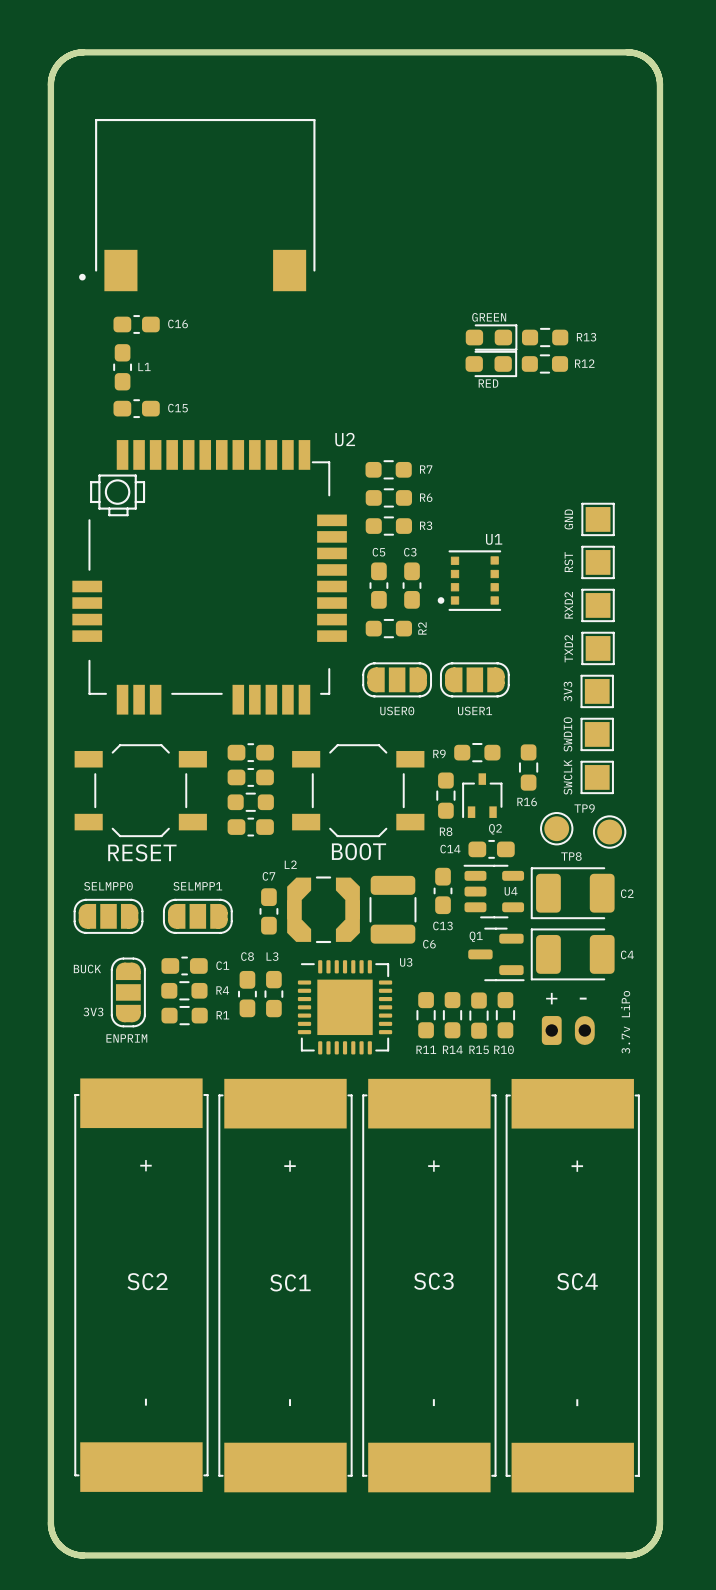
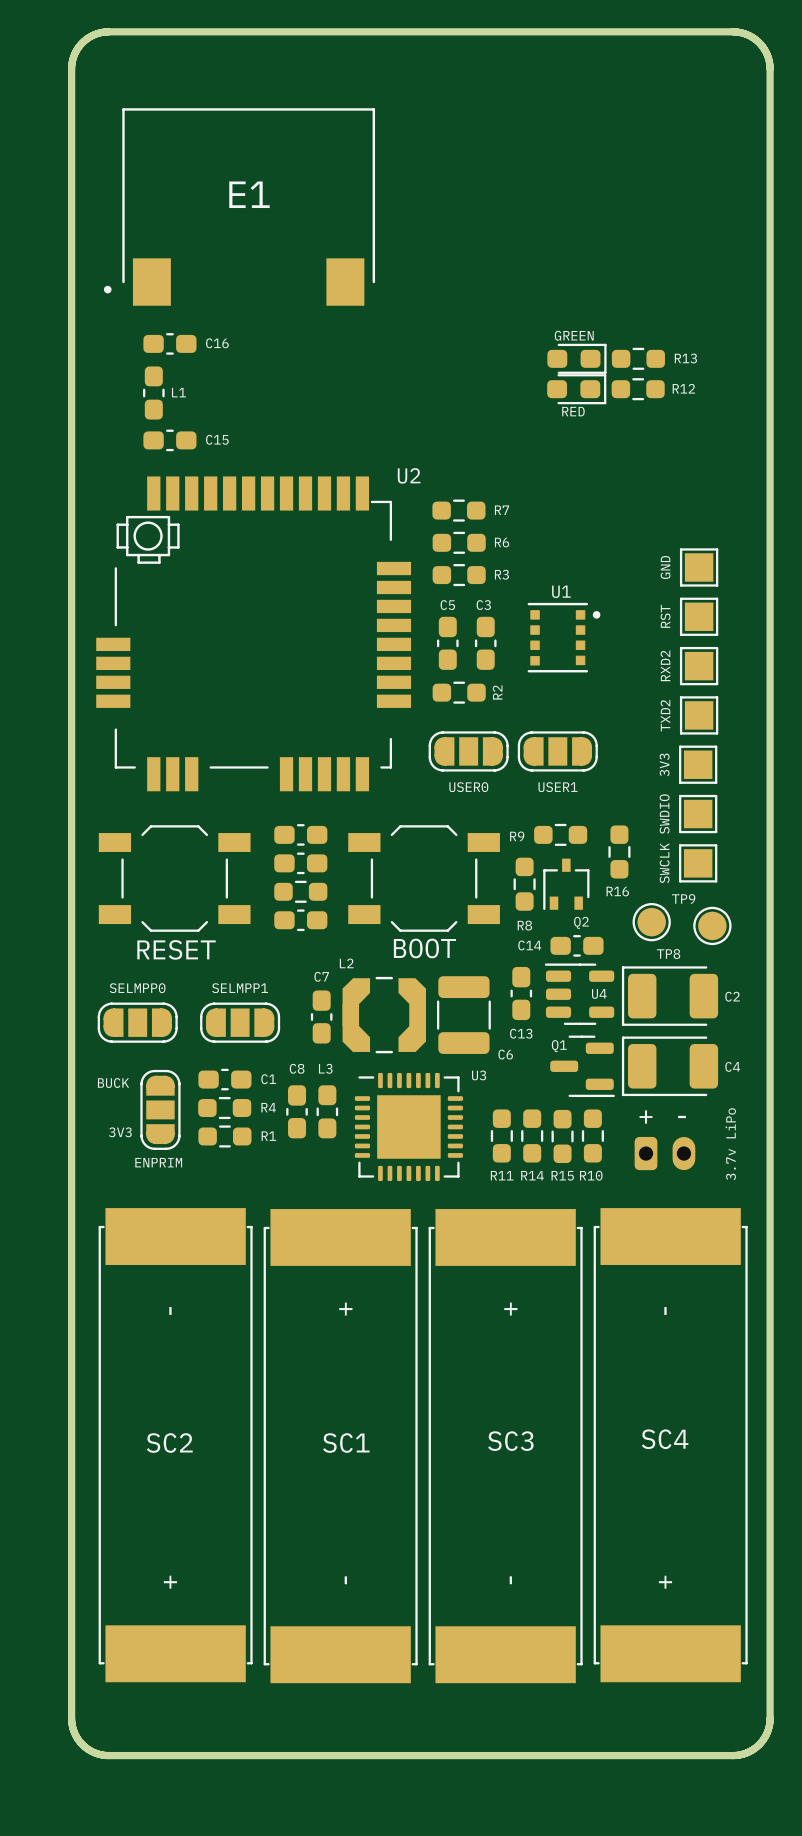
E1 name: none -> E1 (249, 194)
U1 rotation: 0° (469, 580) -> 180° (563, 637)
SC2 rotation: 0° (141, 1285) -> 180° (175, 1445)
SC4 rotation: 0° (572, 1285) -> 180° (670, 1445)

